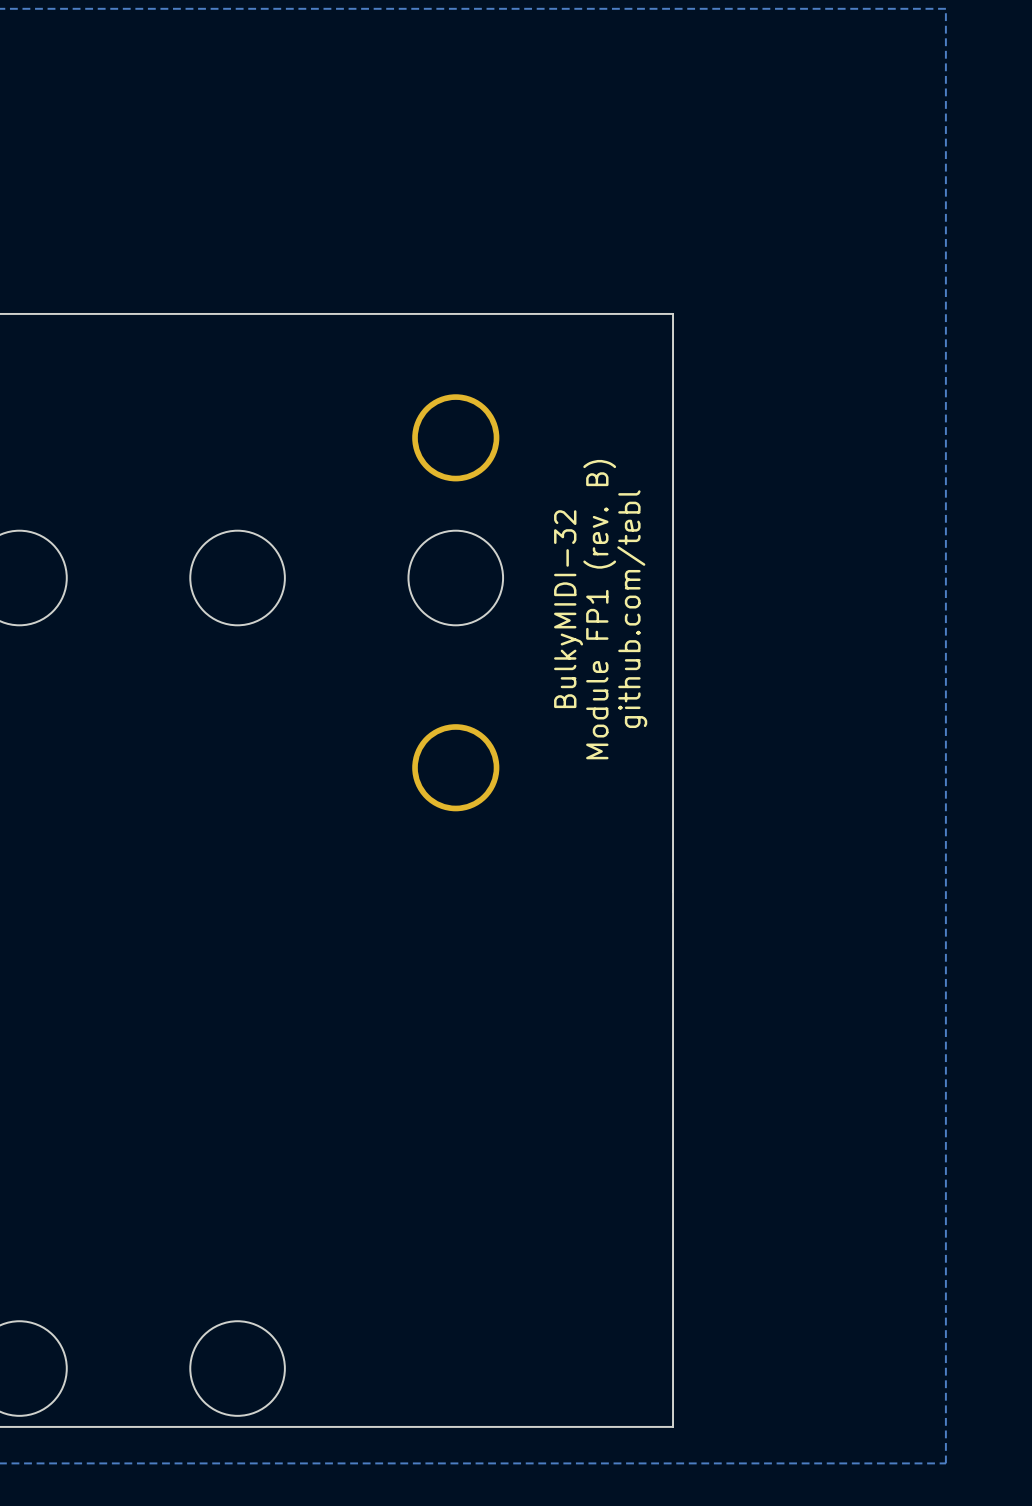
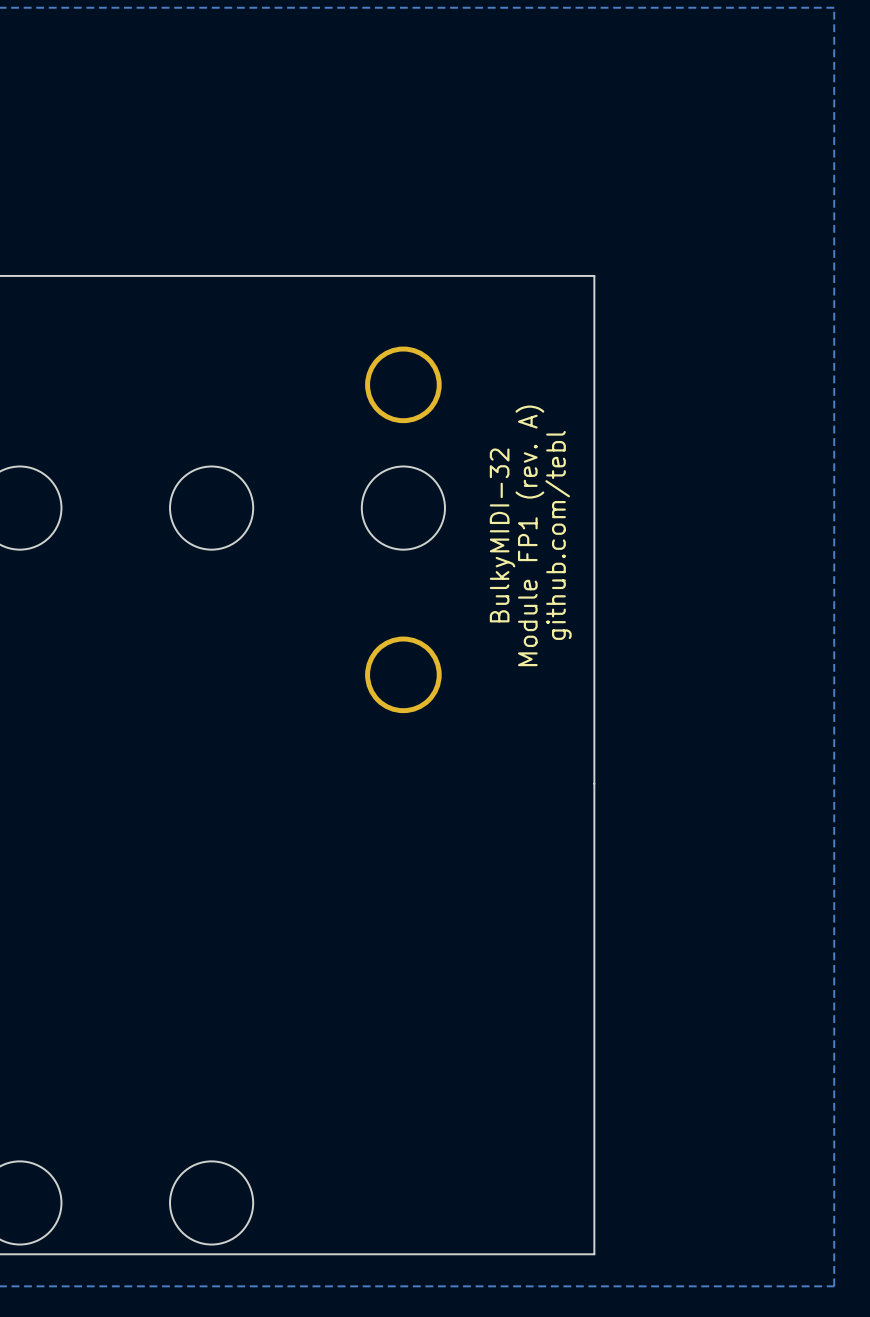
text: Module FP1 (rev. B) (599, 609) -> Module FP1 (rev. A) (529, 535)

